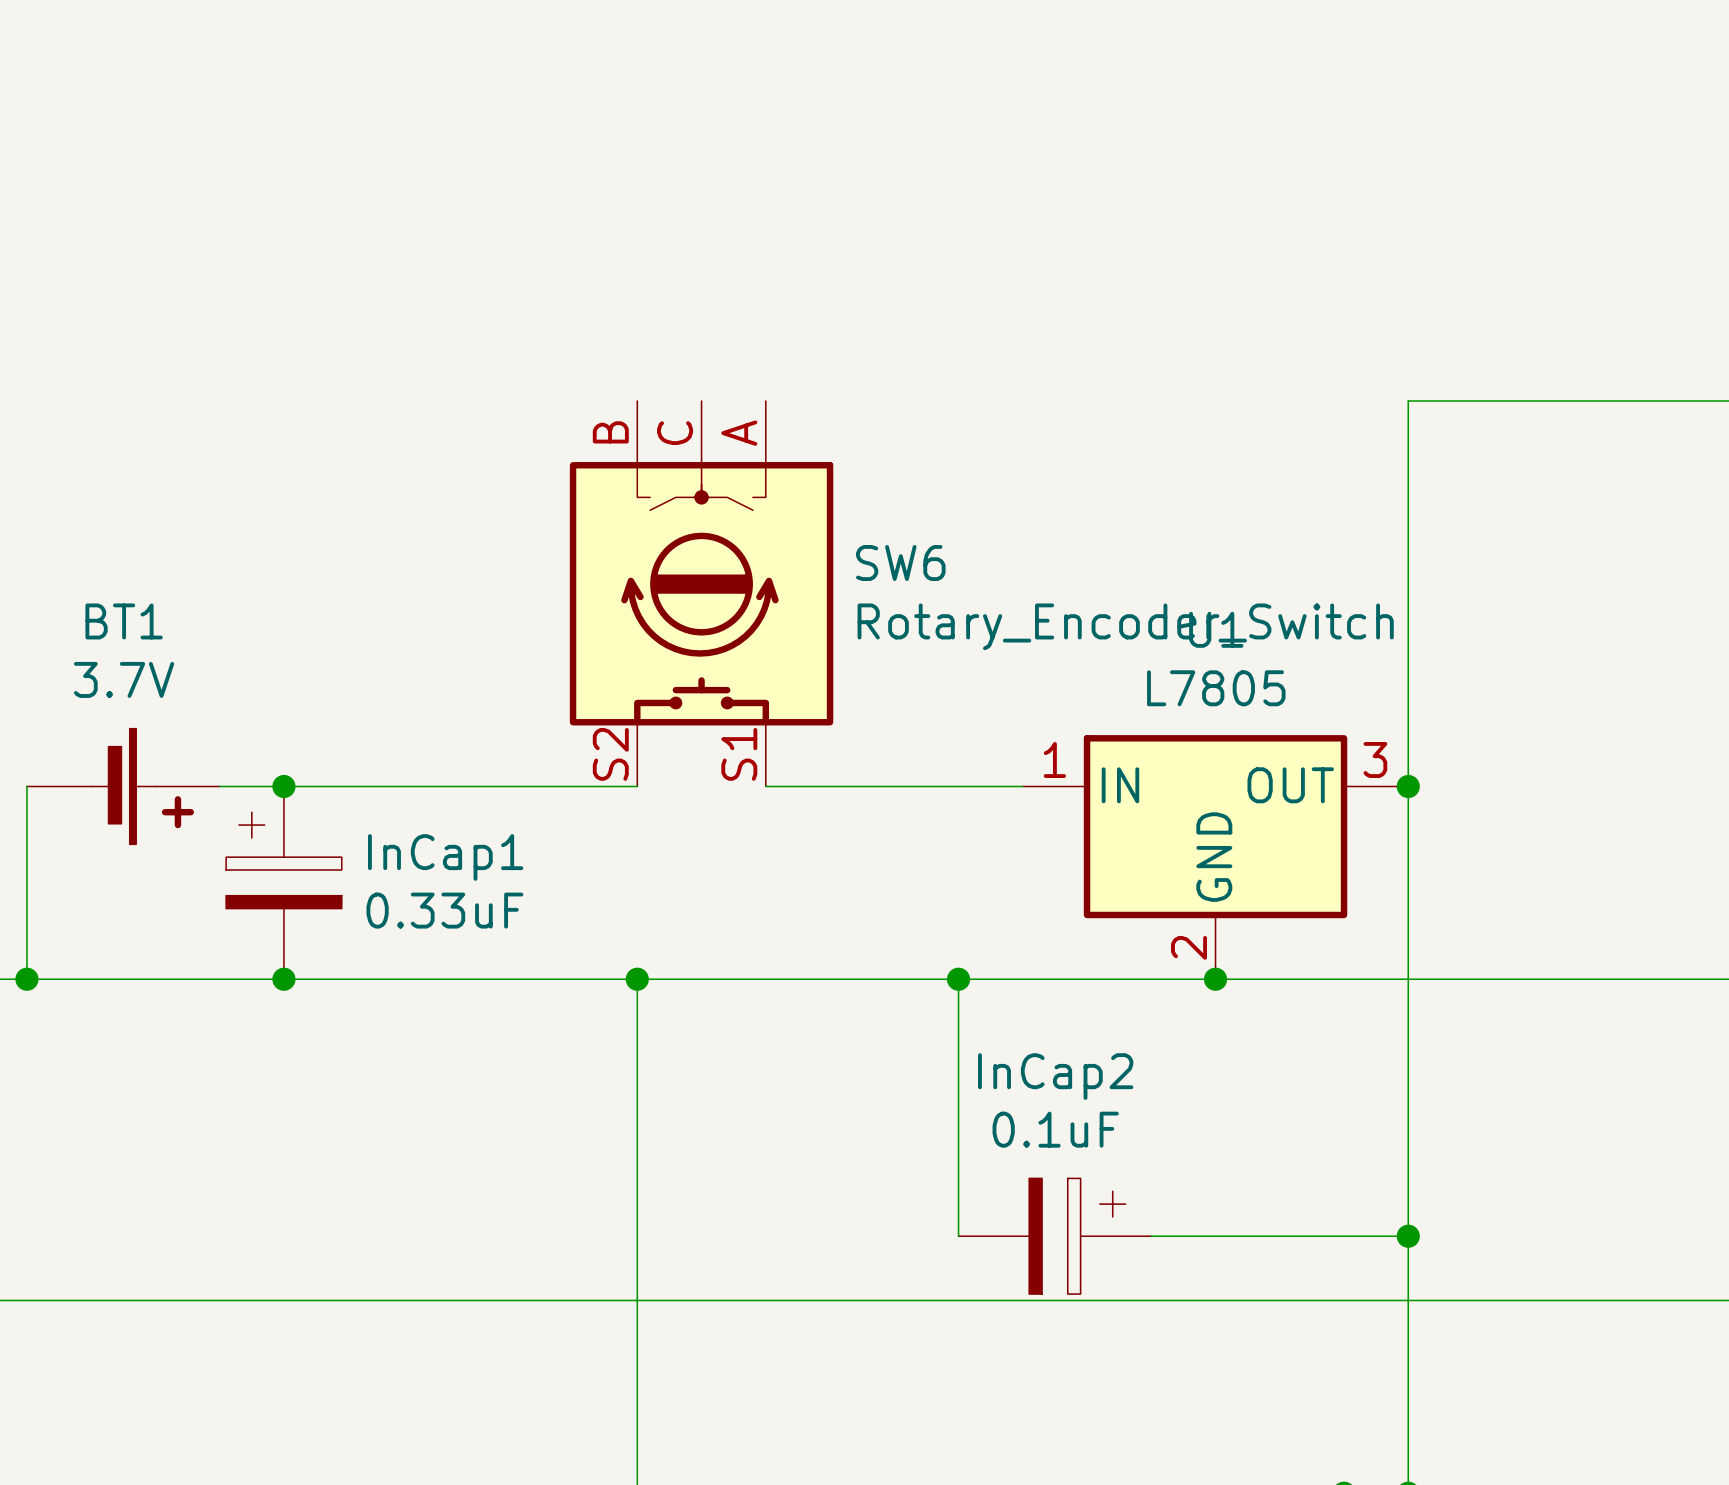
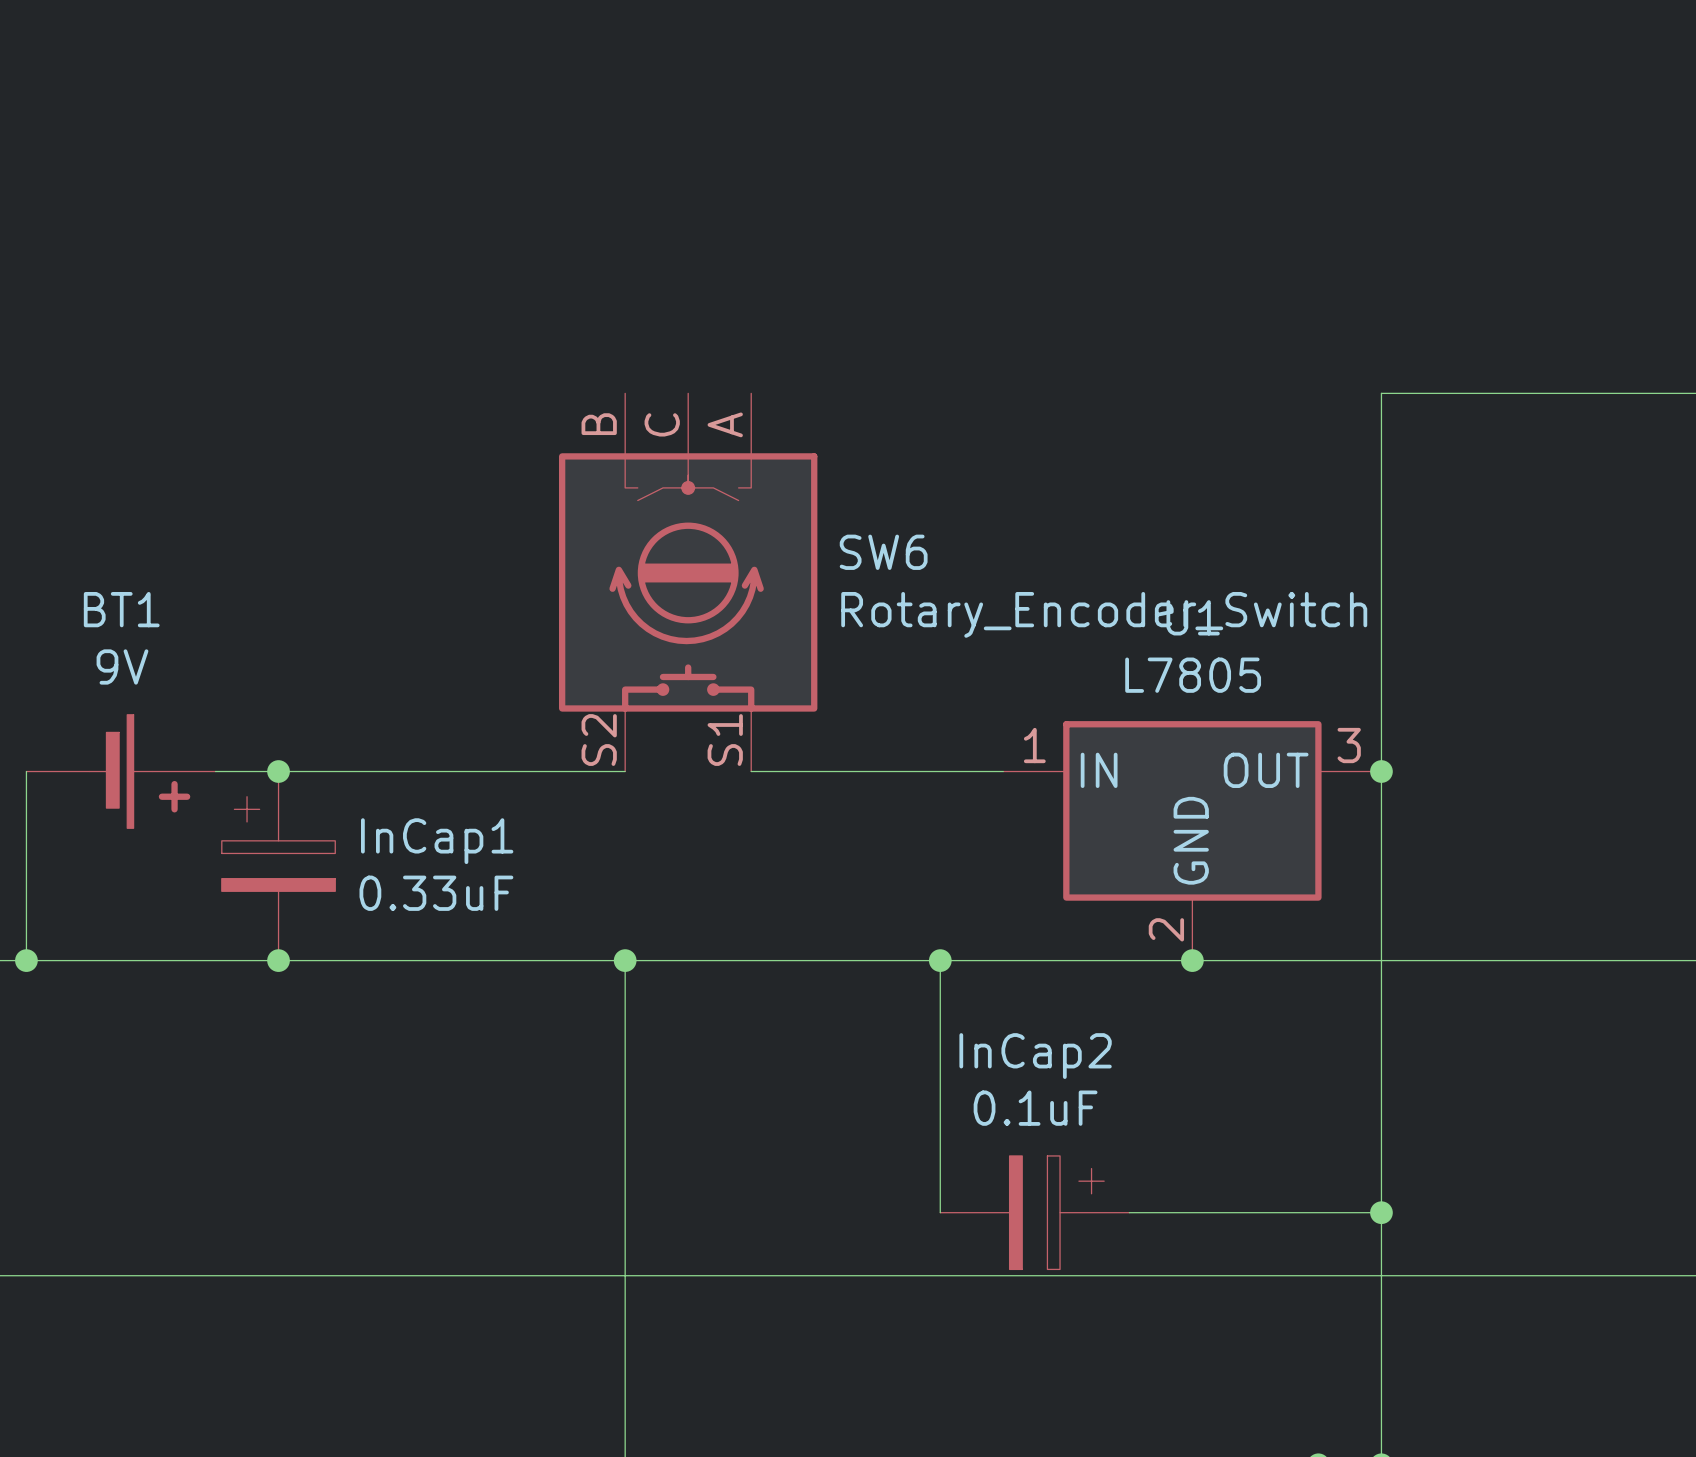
BT1 value: 3.7V (124, 679) -> 9V (122, 666)

